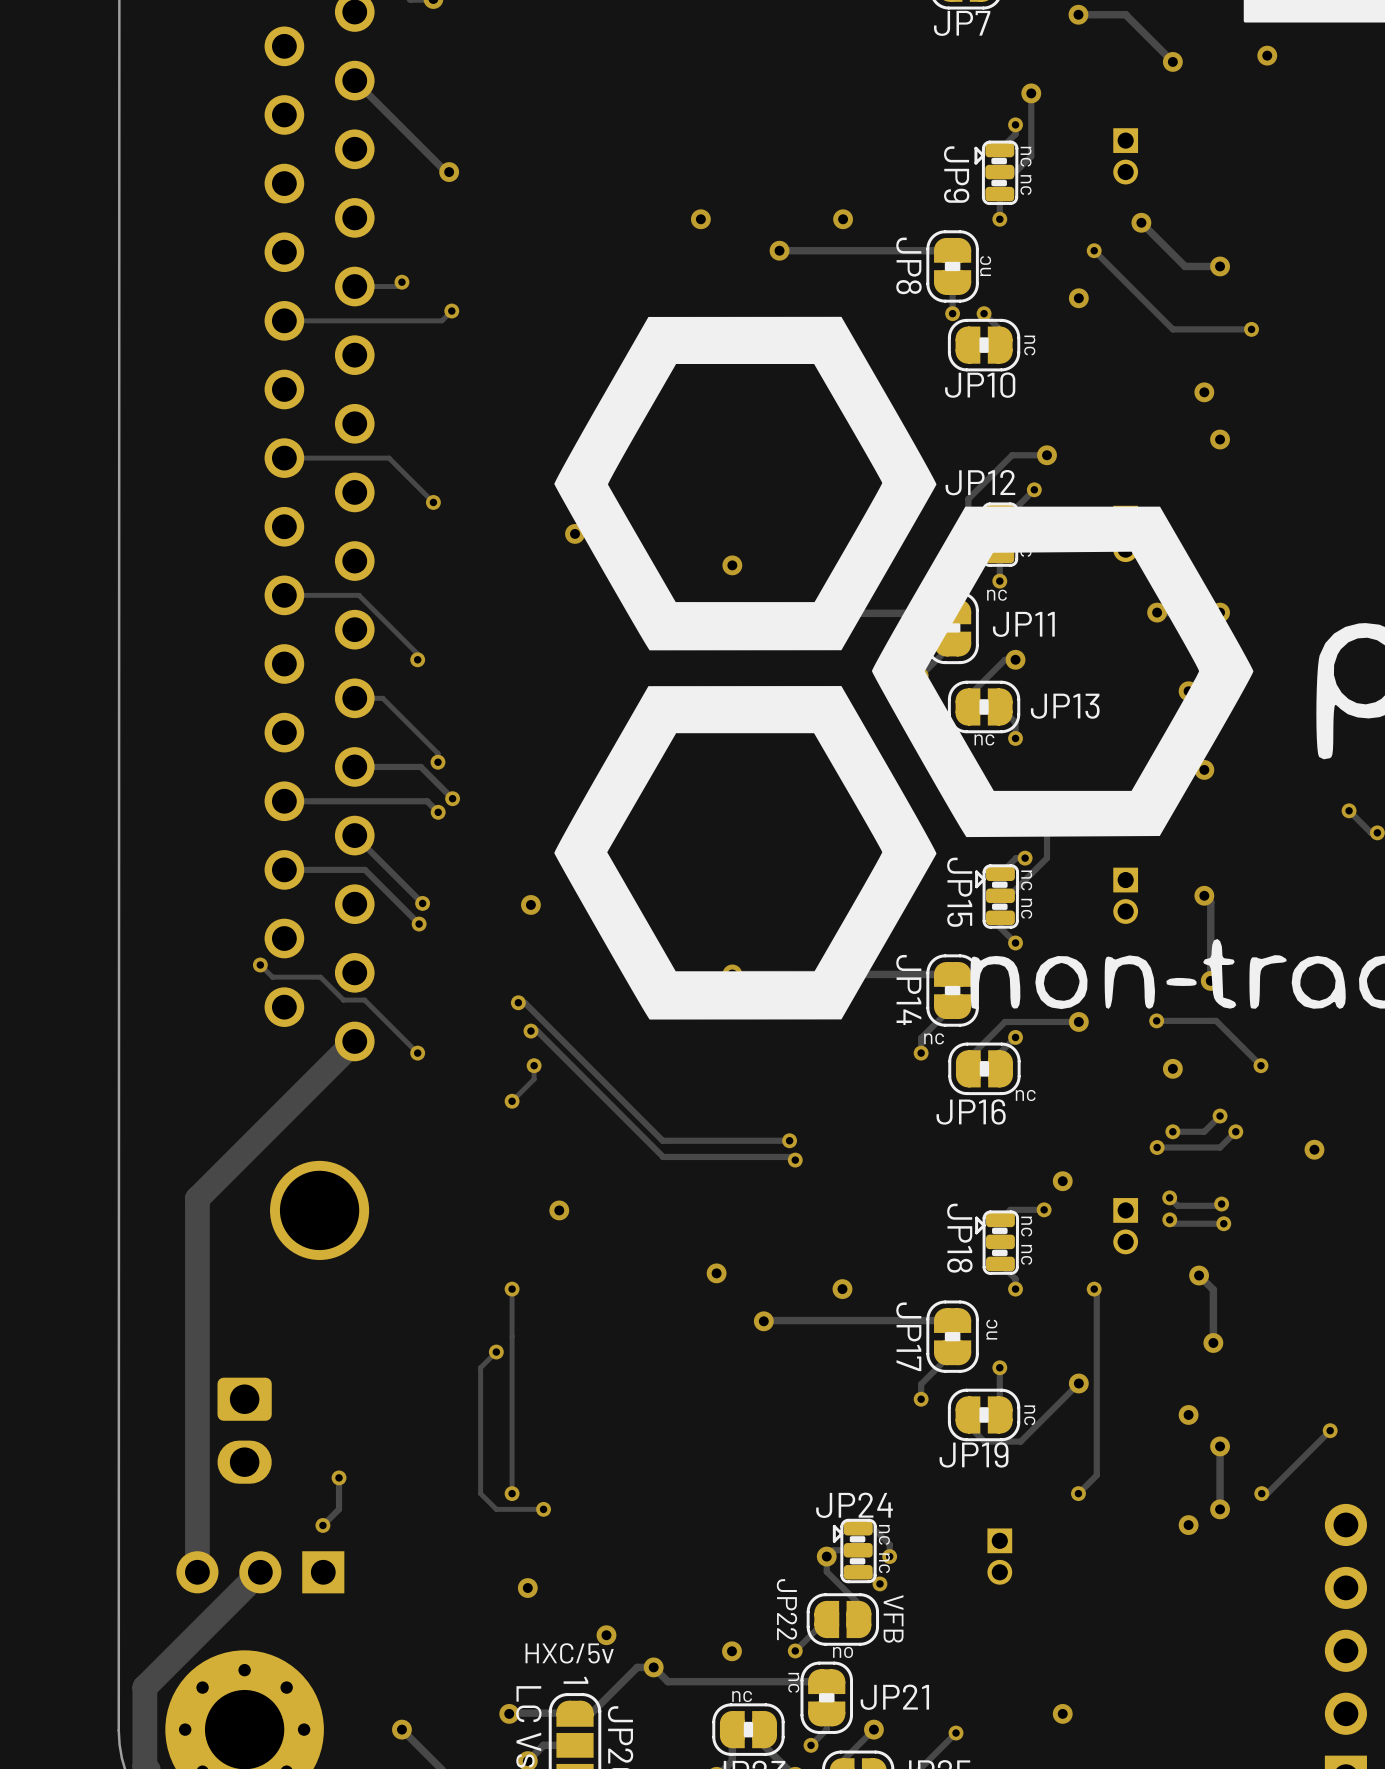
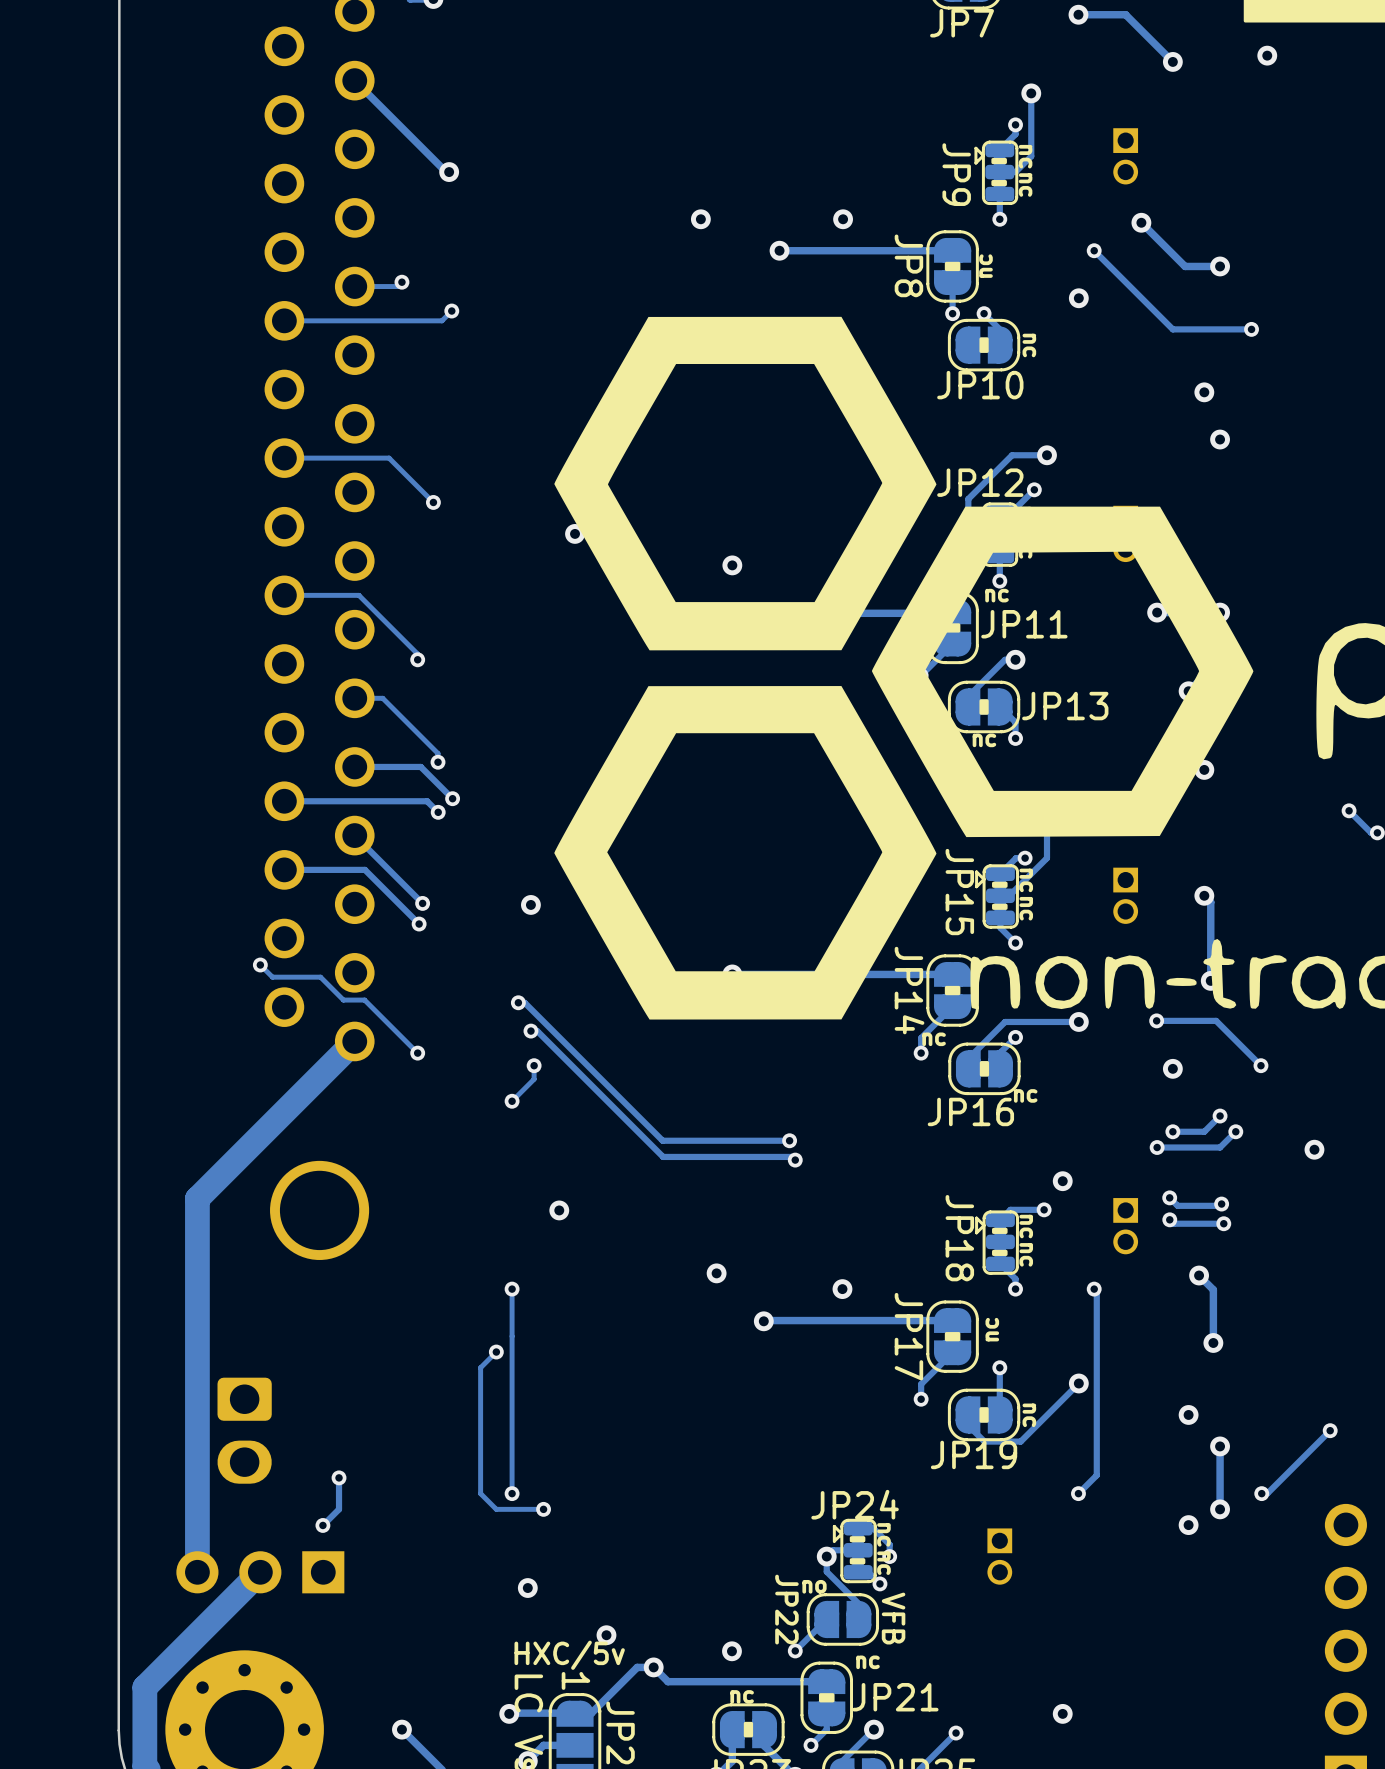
JP22 text position: no (843, 1652) -> no (814, 1586)
JP21 text rotation: 0° (793, 1682) -> 90° counterclockwise (868, 1662)
JP21 text position: nc (793, 1682) -> nc (868, 1662)

